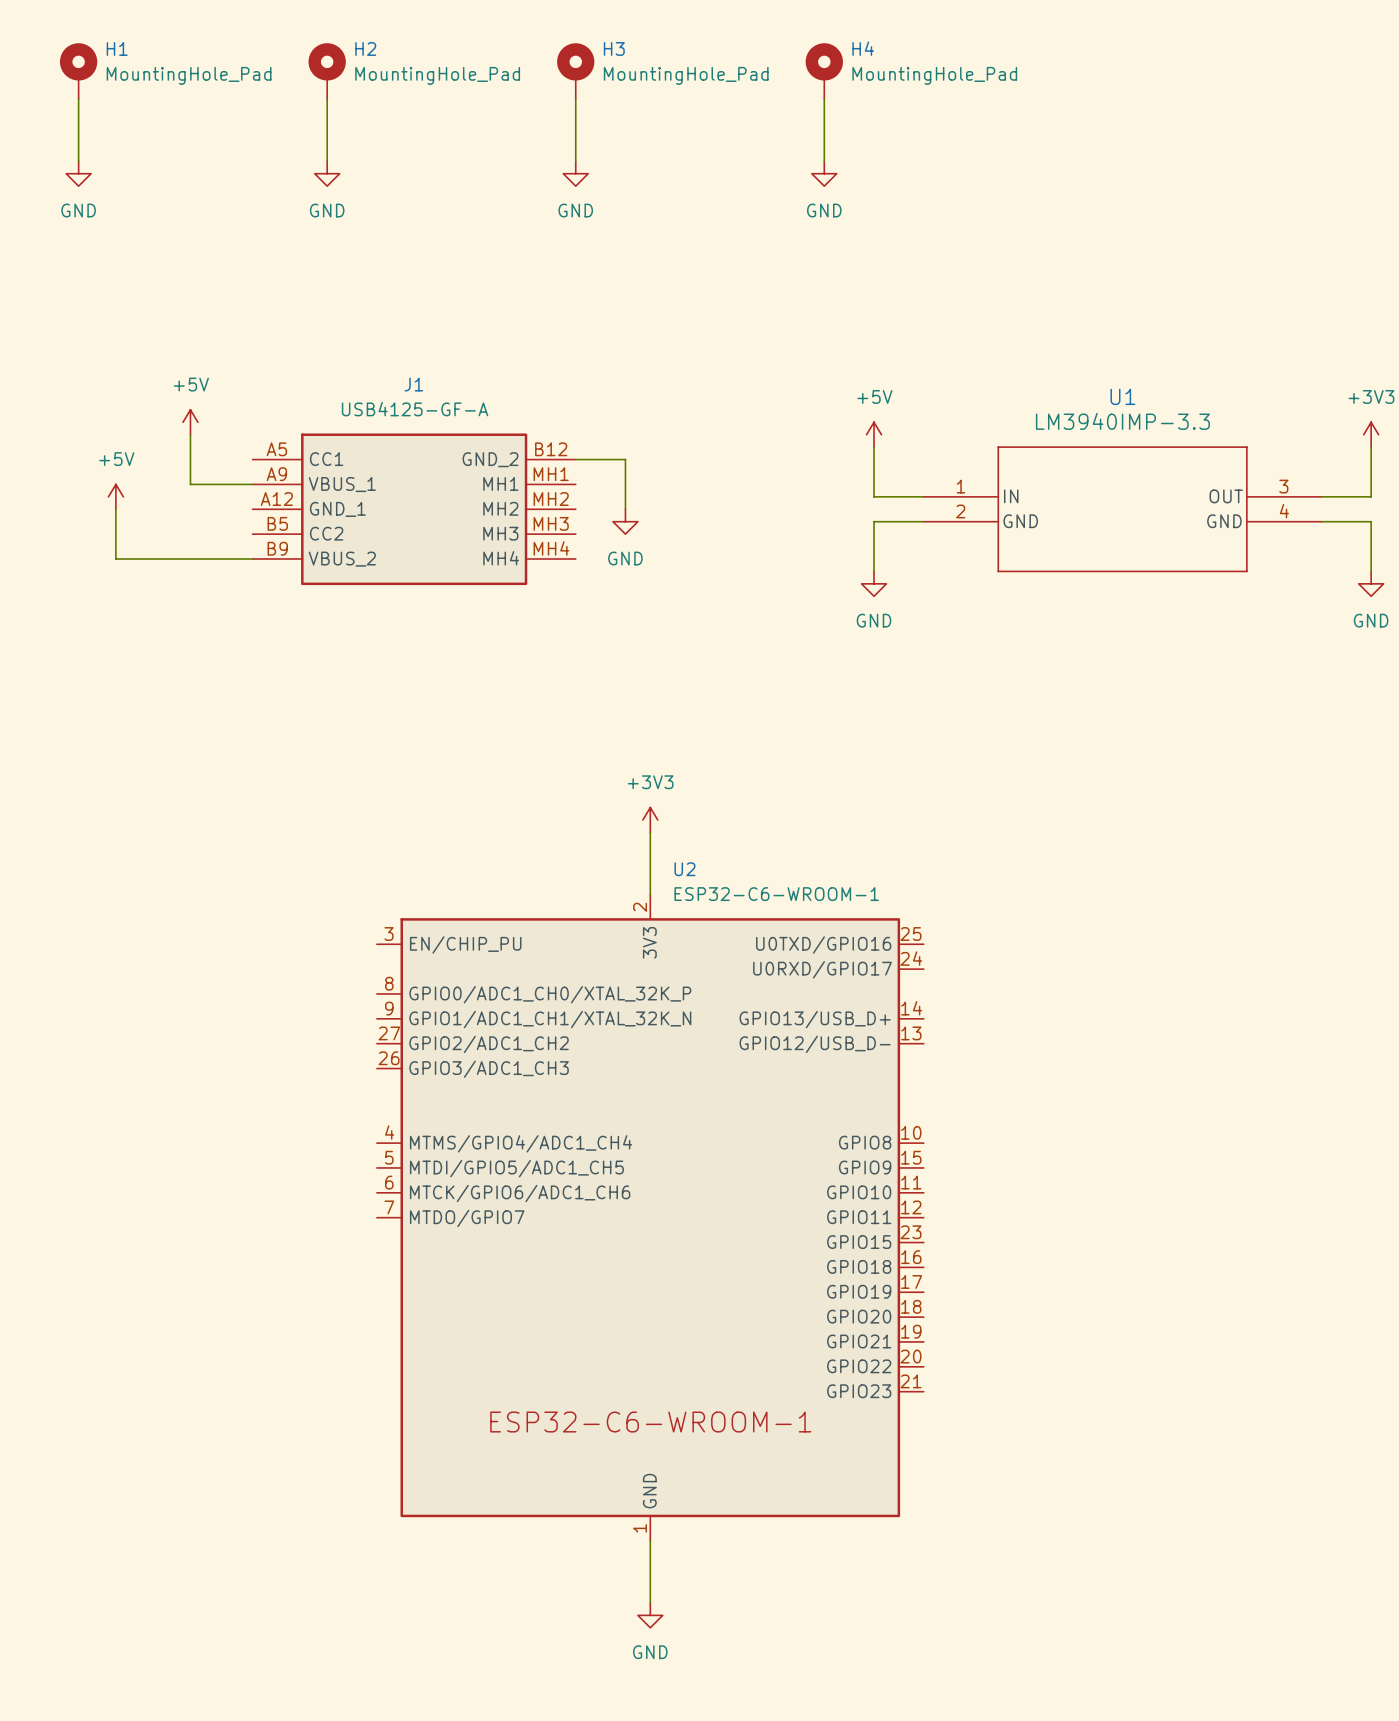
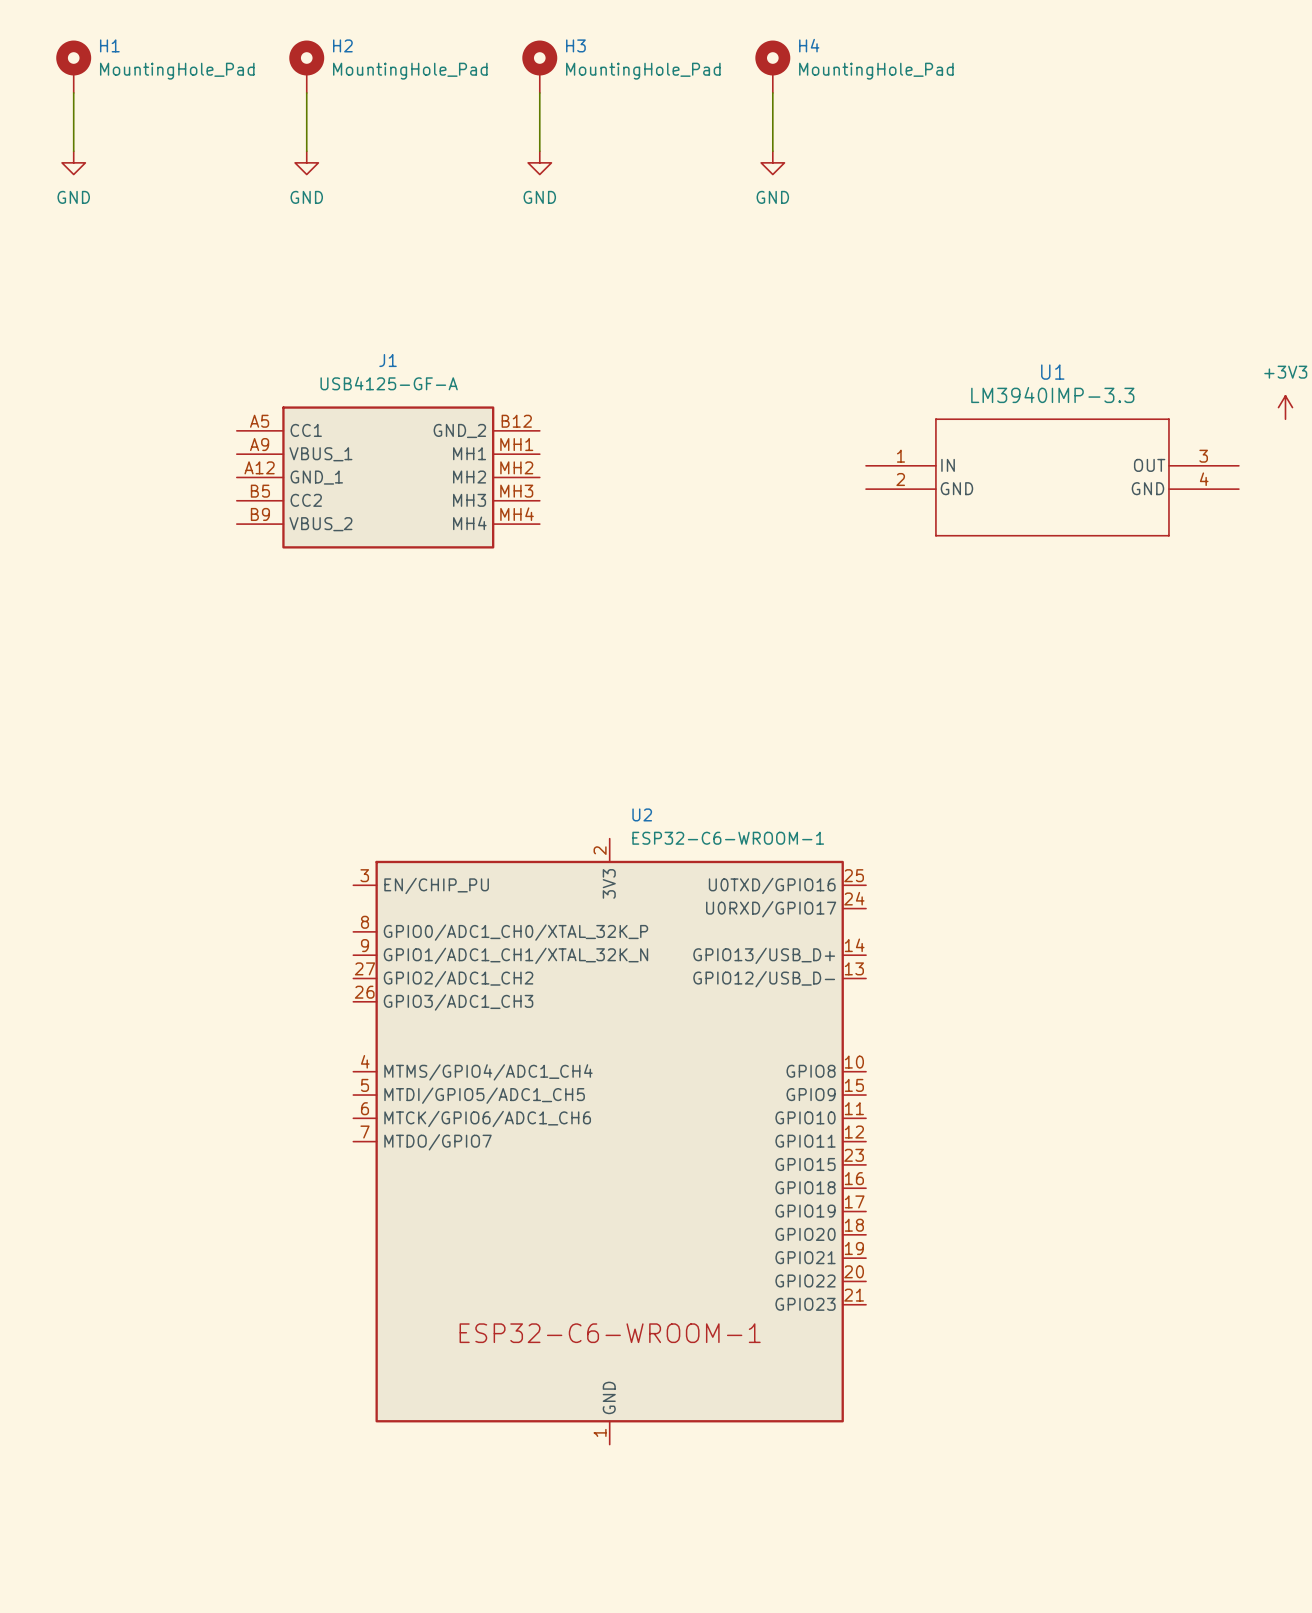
power symbol: +5V (190, 422) -> none
wire: (190, 434) (190, 484) (252, 484) -> none
power symbol: +5V (874, 434) -> none
wire: (874, 447) (874, 496) (923, 496) -> none
wire: (1371, 447) (1371, 496) (1321, 496) -> none
wire: (575, 459) (625, 459) (625, 509) -> none
power symbol: +5V (115, 496) -> none
wire: (115, 509) (115, 558) (252, 558) -> none
power symbol: GND (625, 521) -> none
wire: (923, 521) (874, 521) (874, 571) -> none
wire: (1321, 521) (1371, 521) (1371, 571) -> none
power symbol: GND (874, 583) -> none
power symbol: GND (1371, 583) -> none
power symbol: +3V3 (650, 819) -> none
wire: (650, 832) (650, 894) -> none
wire: (650, 1540) (650, 1602) -> none
power symbol: GND (650, 1615) -> none

